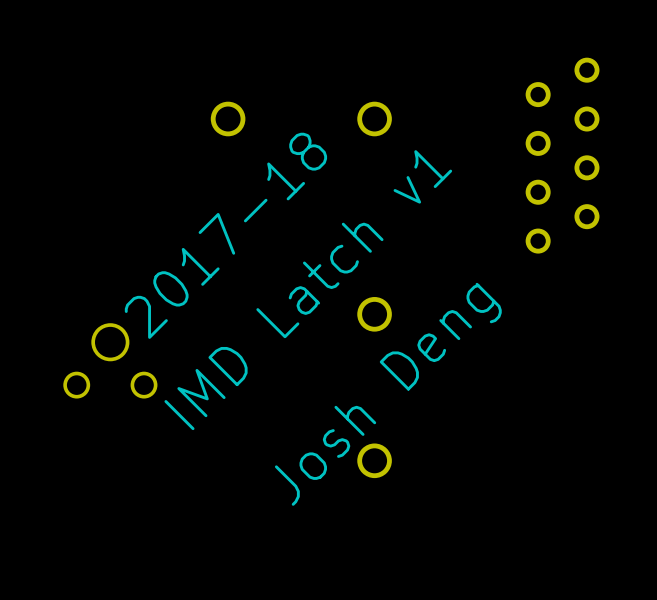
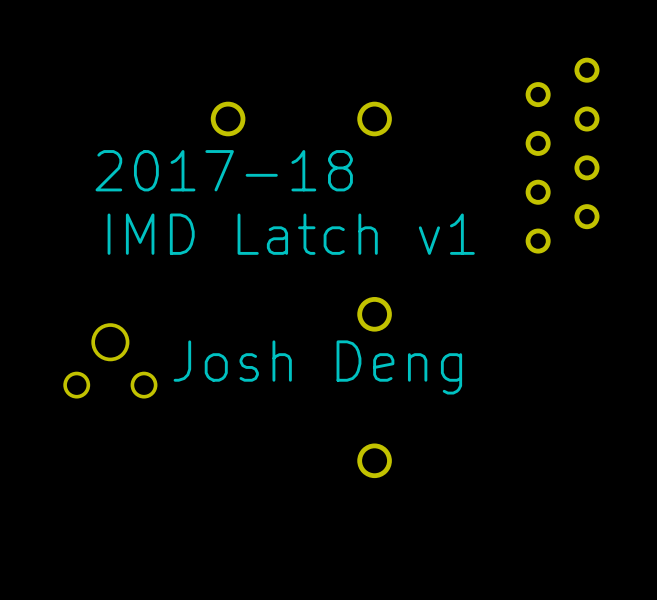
text rotation: 0° (225, 235) -> 45° clockwise (224, 170)
text rotation: 0° (308, 290) -> 45° clockwise (291, 234)
text rotation: 0° (388, 394) -> 45° clockwise (317, 367)

